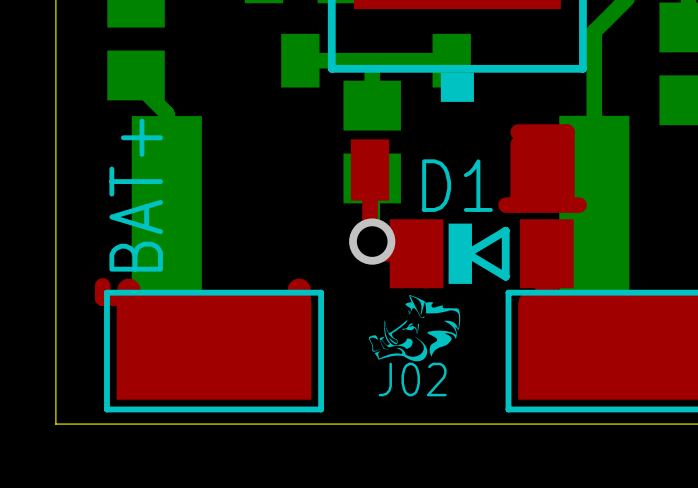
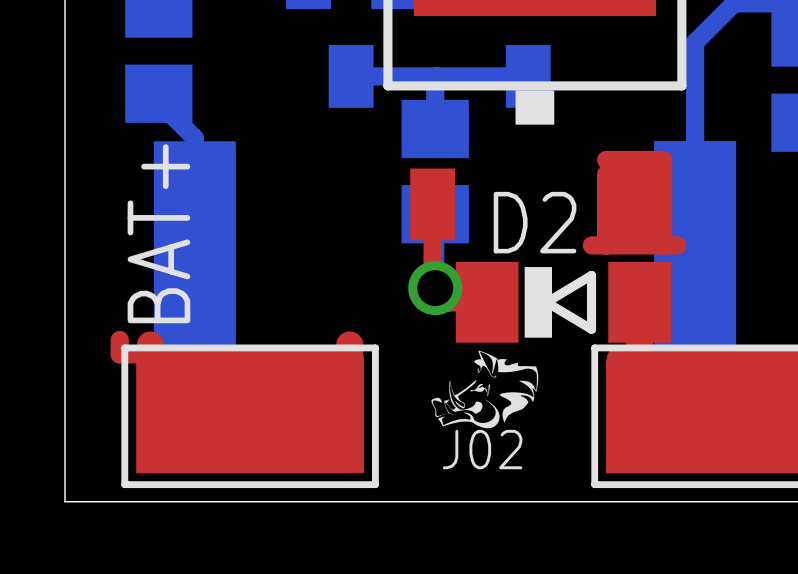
D1 name: D1 (457, 185) -> D2 (535, 222)

